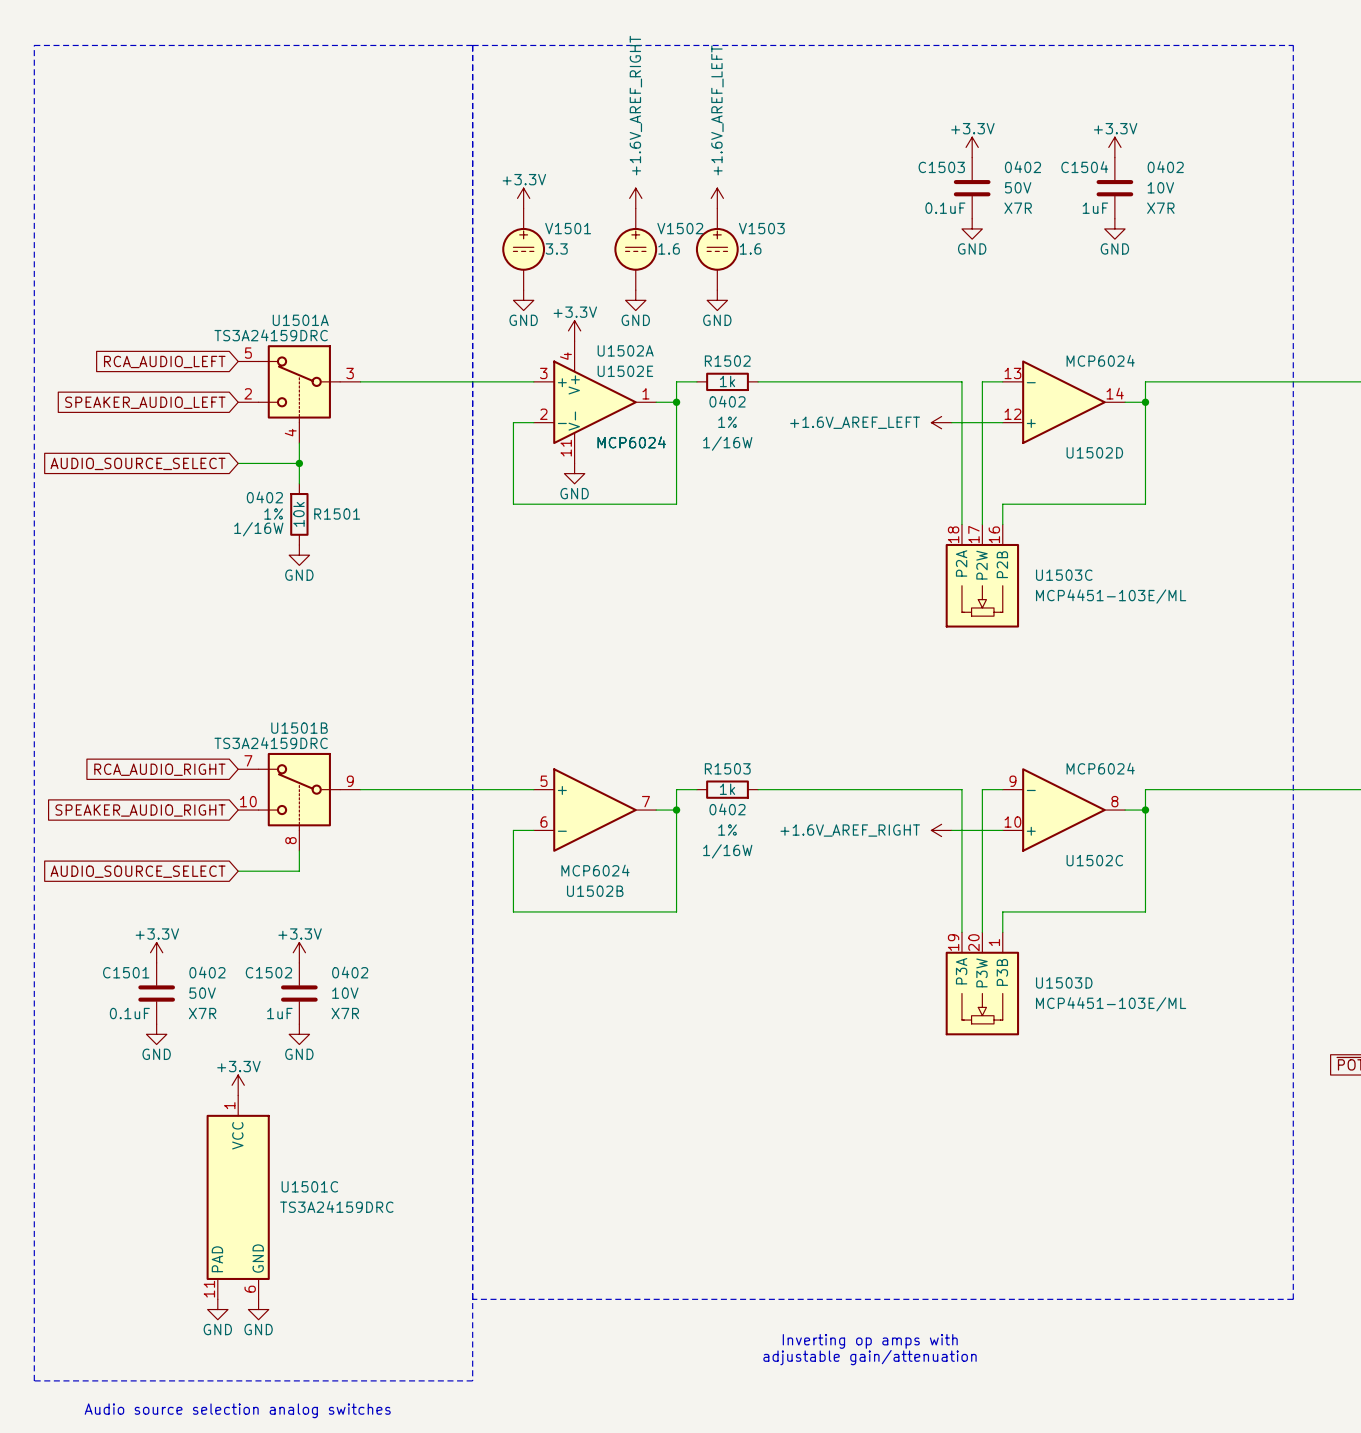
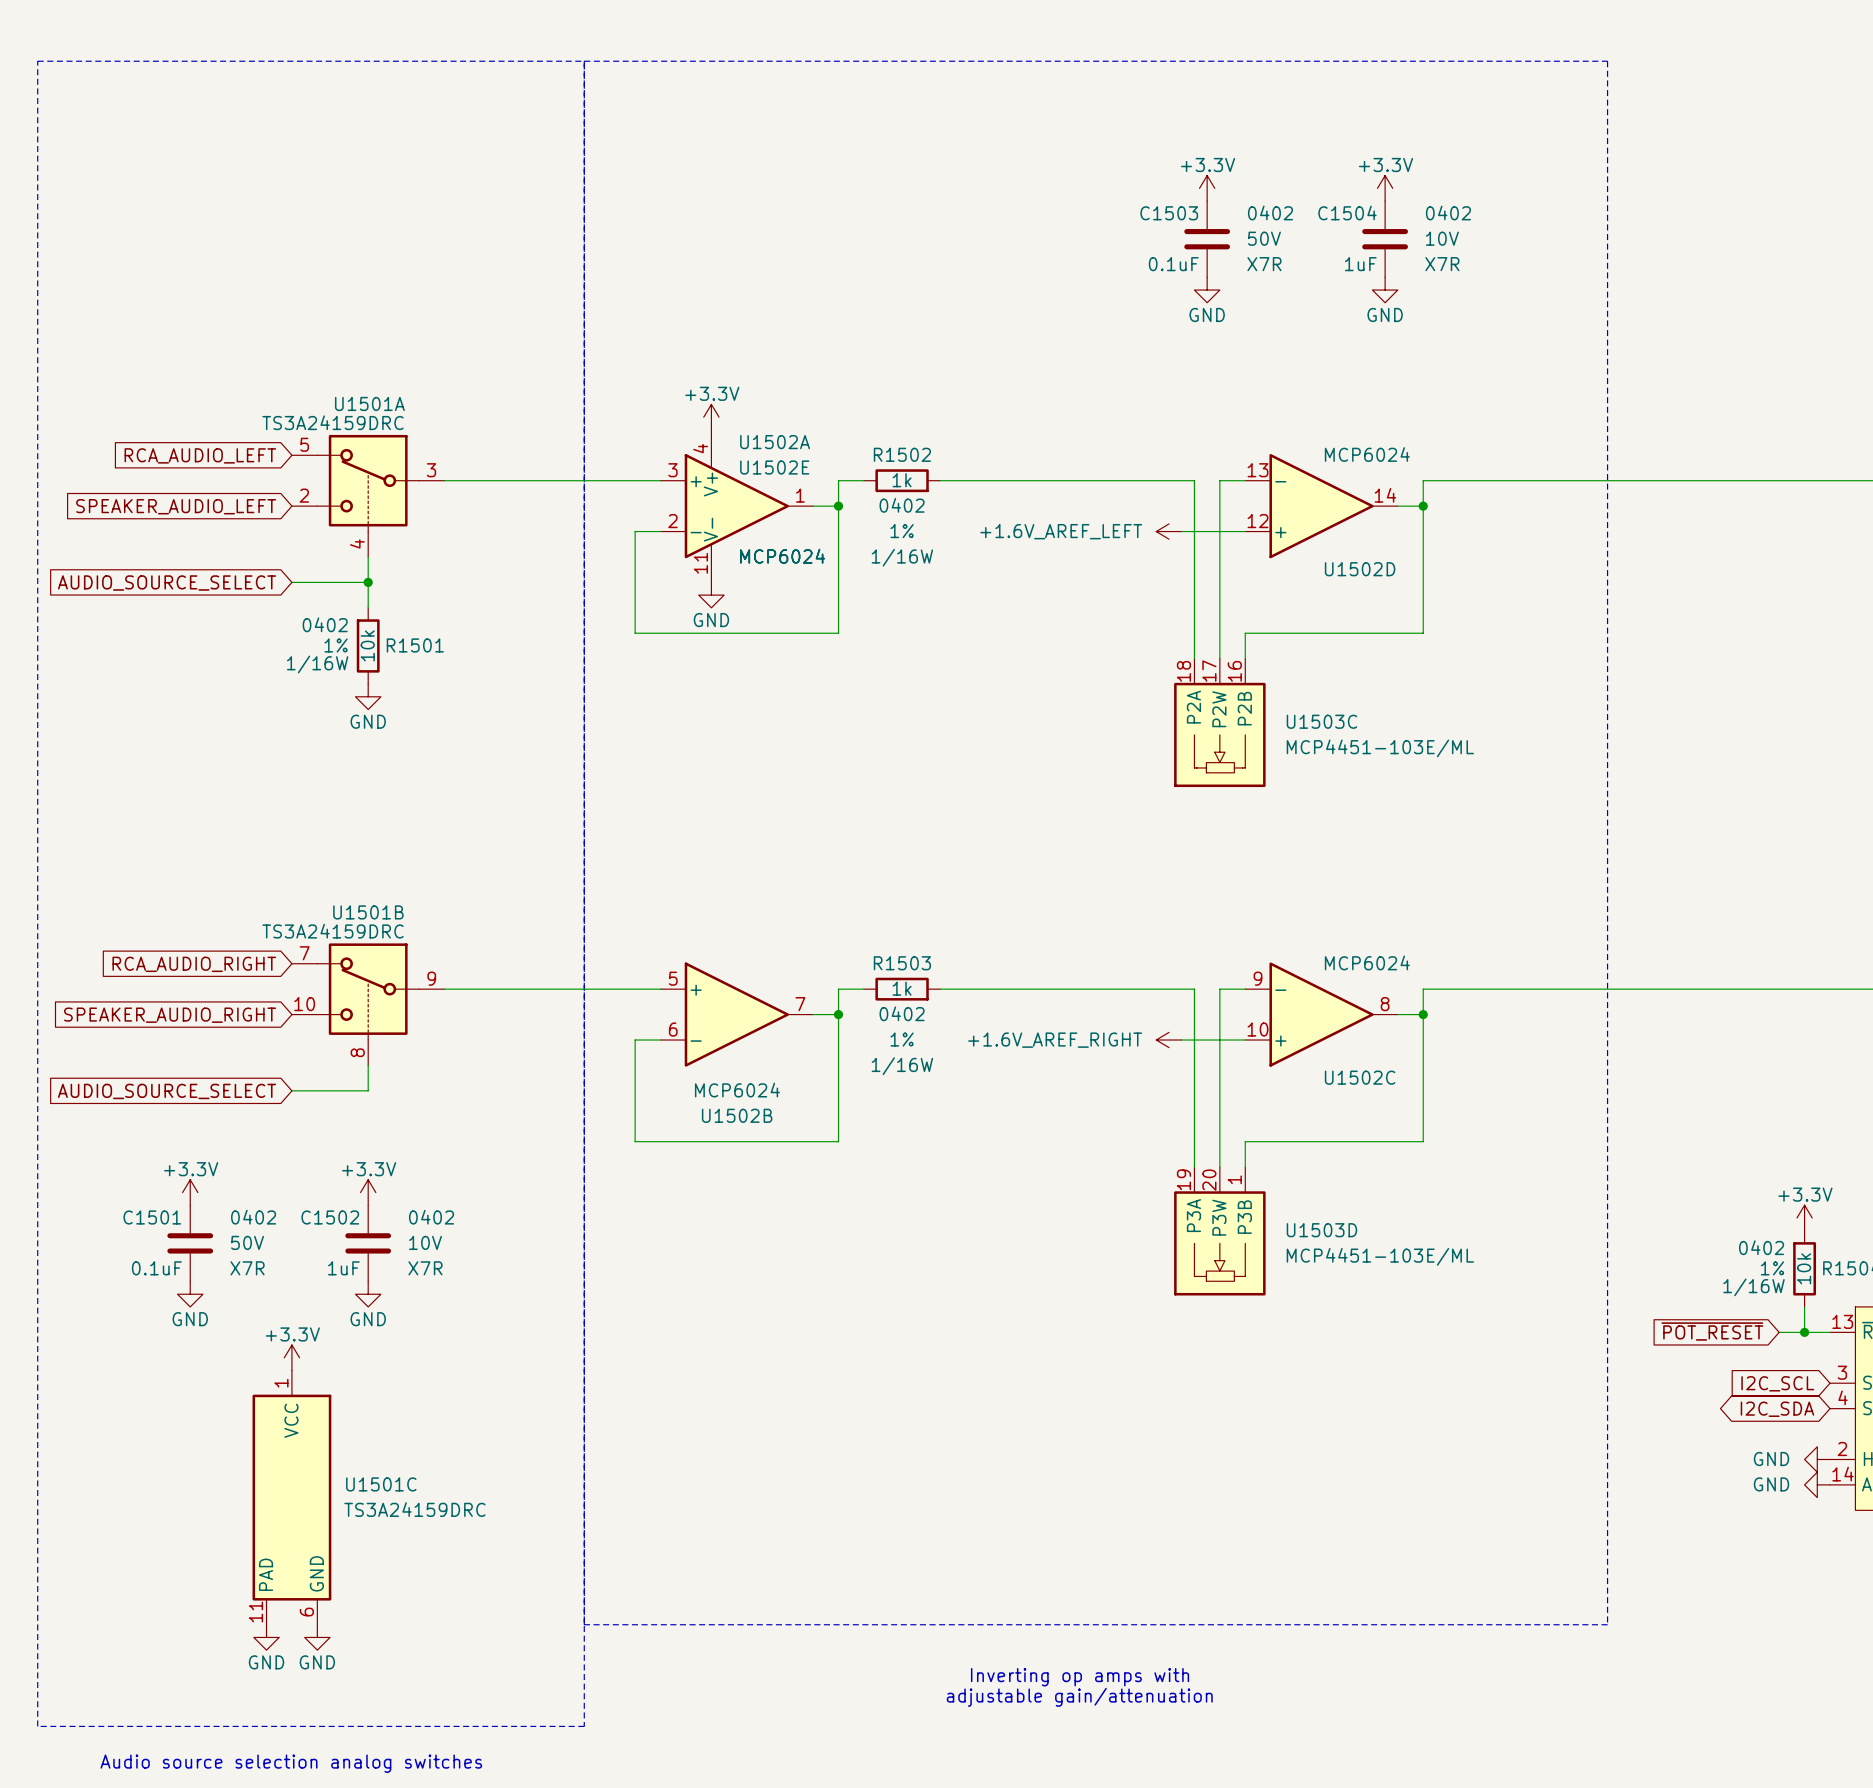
power symbol: +3.3V (523, 198) -> none
power symbol: +1.6V_AREF_RIGHT (635, 198) -> none
power symbol: +1.6V_AREF_LEFT (717, 198) -> none
V1501: 3.3 (523, 249) -> none
V1502: 1.6 (635, 249) -> none
V1503: 1.6 (717, 249) -> none
power symbol: GND (523, 300) -> none
power symbol: GND (635, 300) -> none
power symbol: GND (717, 300) -> none

